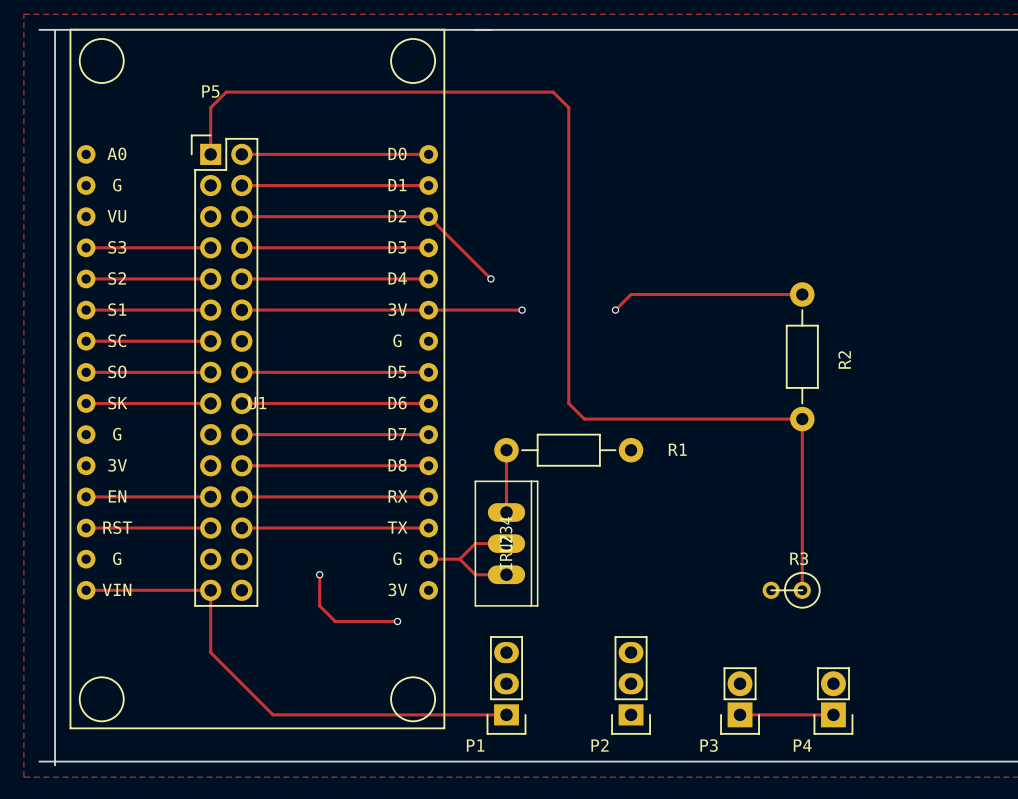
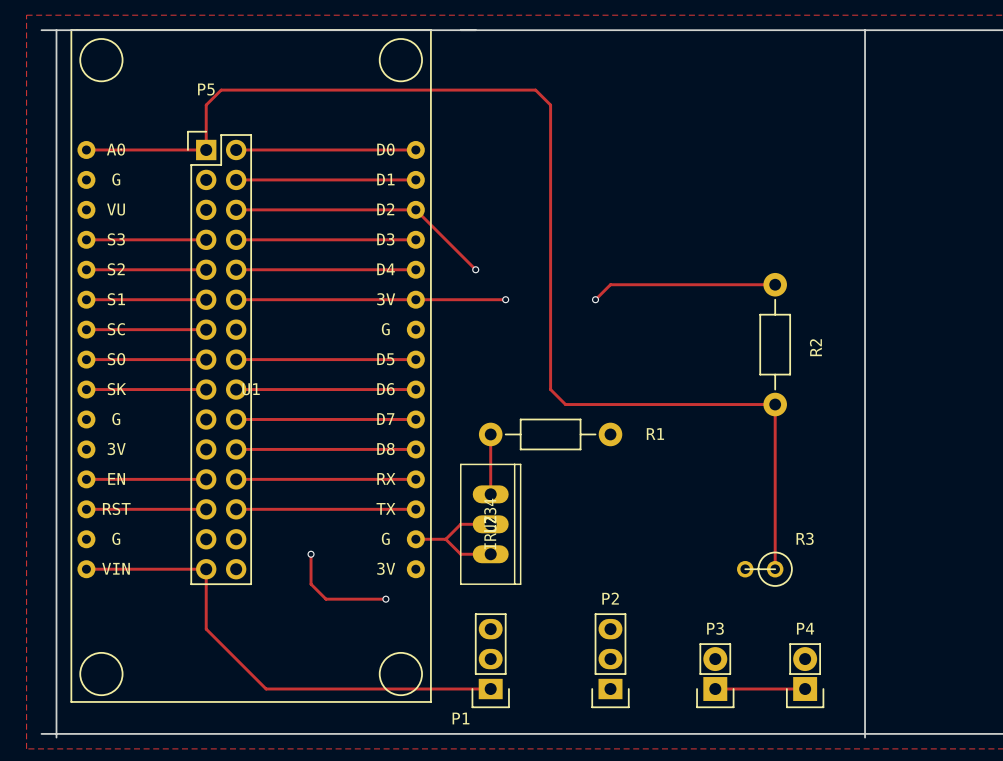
board edge: none -> (865, 30) (865, 737)
track: none -> (86, 149) (206, 149)
R3 name position: R3 (799, 558) -> R3 (805, 538)
P2 name position: P2 (600, 745) -> P2 (610, 598)
P3 name position: P3 (709, 745) -> P3 (715, 628)
P4 name position: P4 (802, 745) -> P4 (805, 628)

